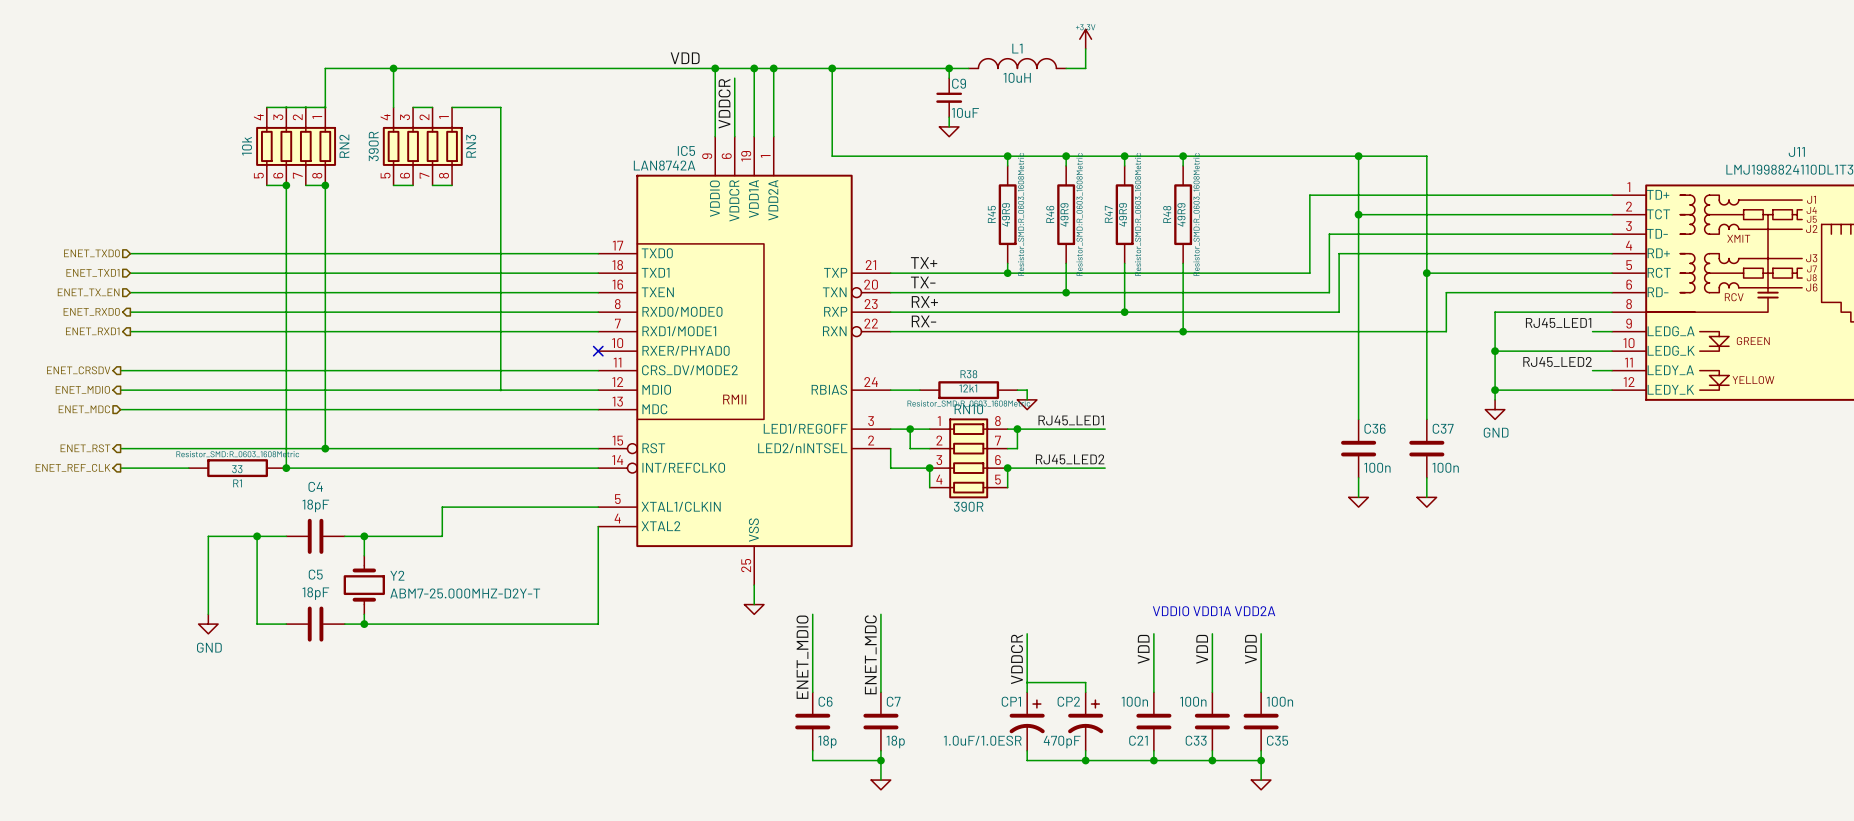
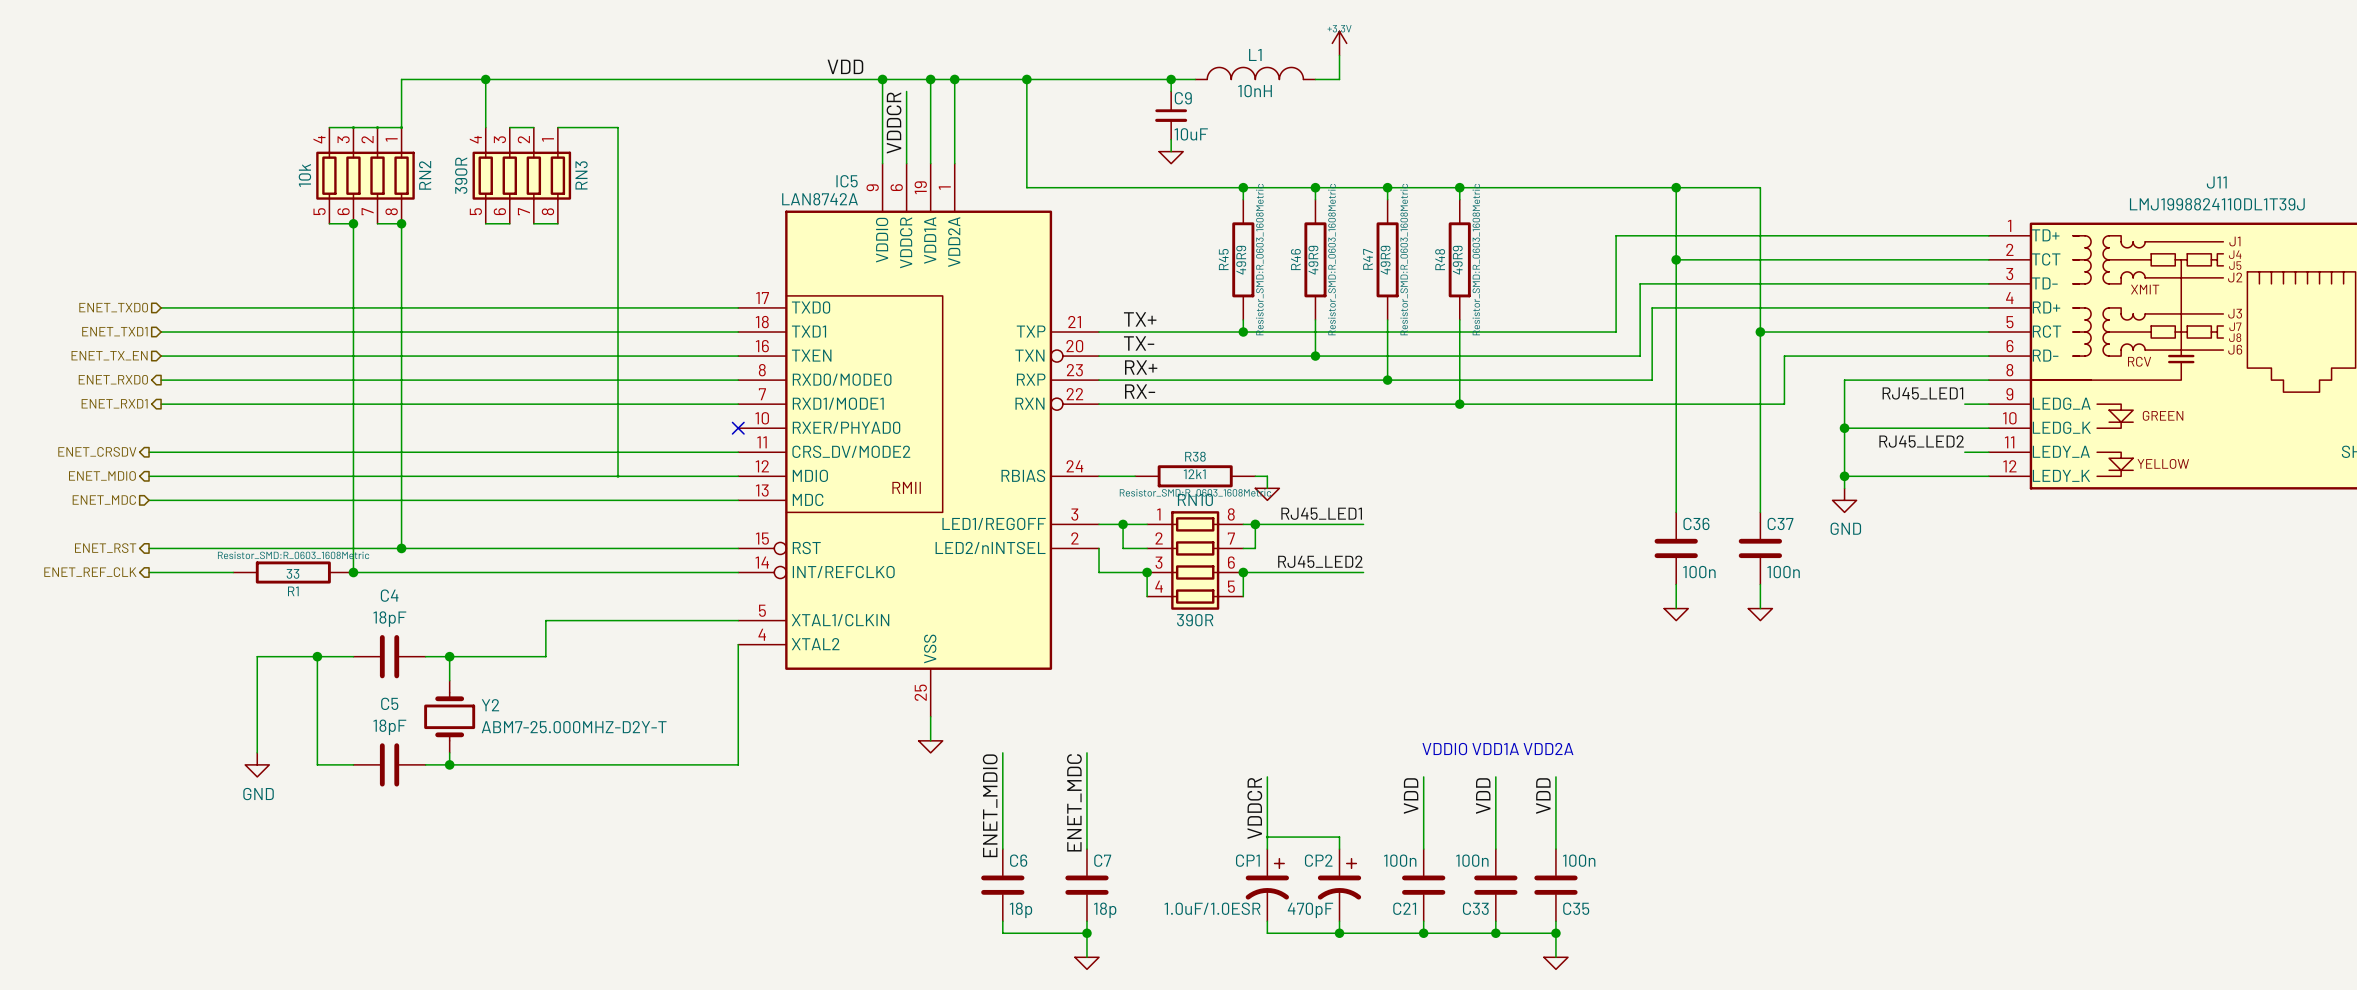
L1 value: 10uH (1017, 77) -> 10nH (1255, 91)

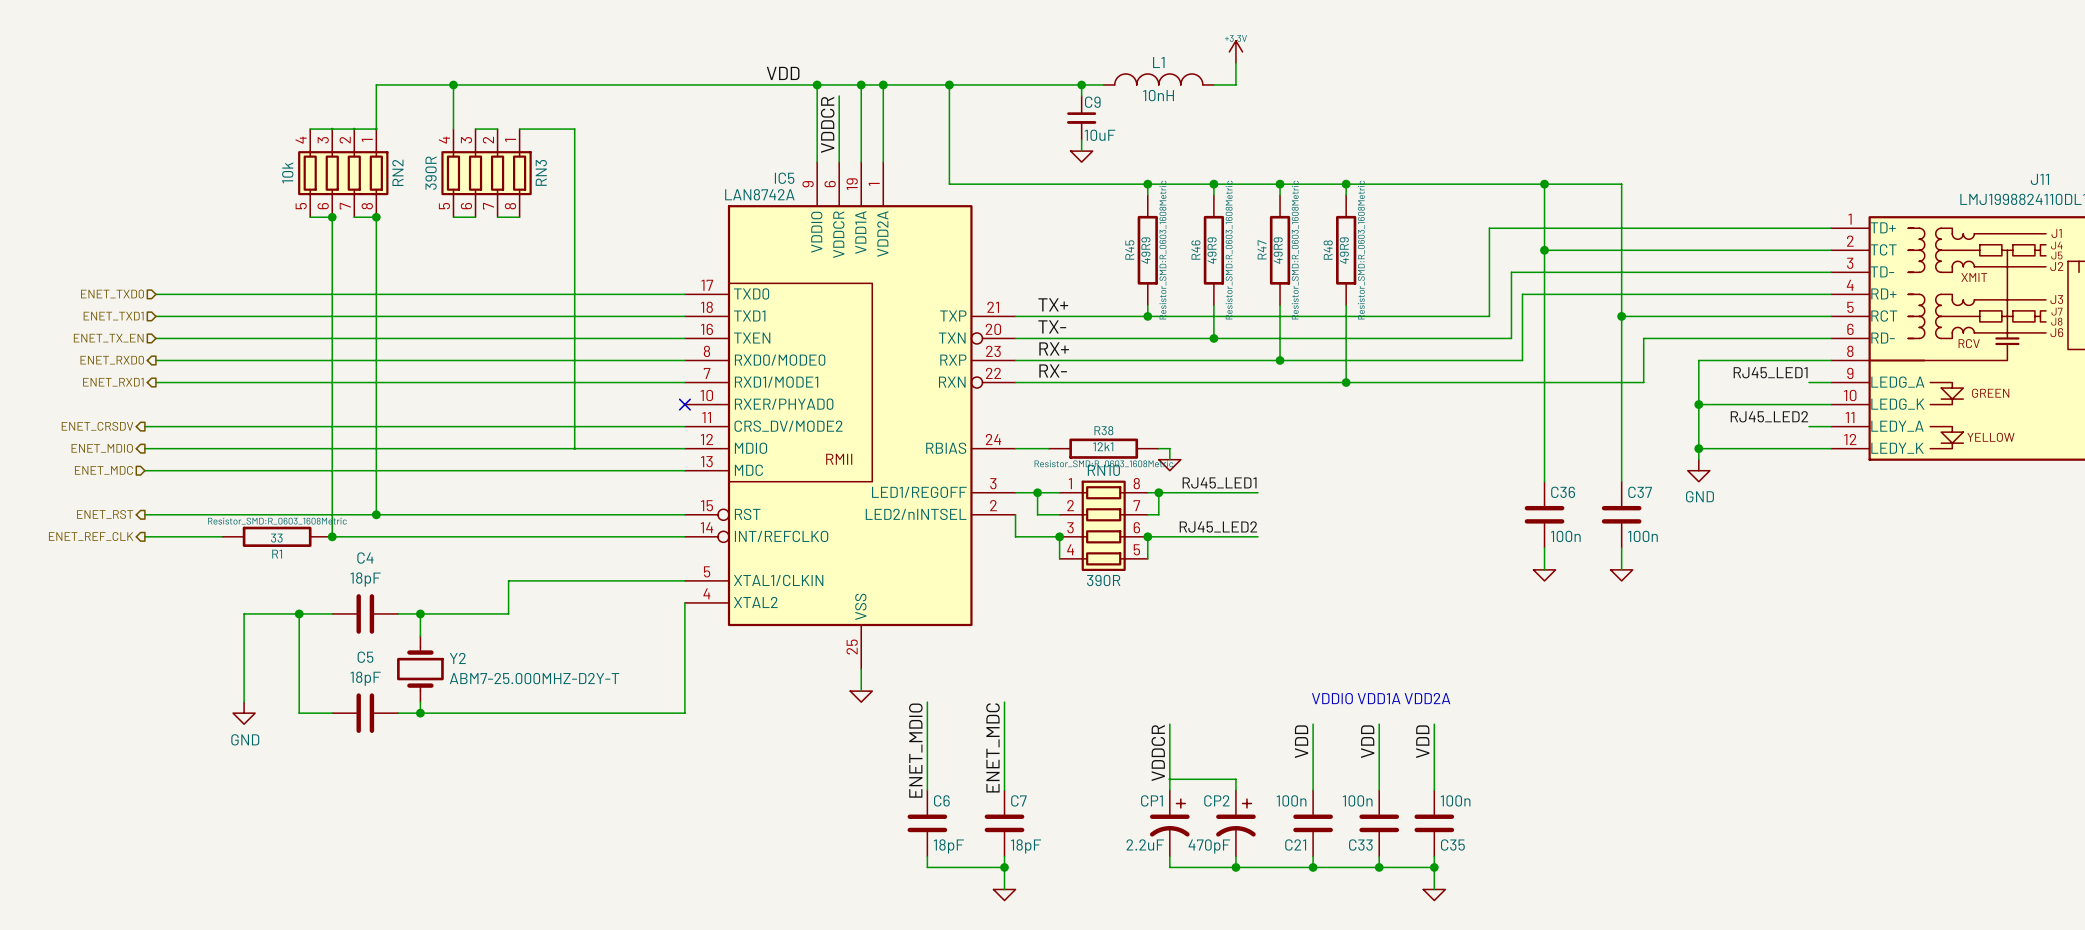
CP1 value: 1.0uF/1.0ESR (1212, 908) -> 2.2uF (1145, 844)
C6 value: 18p (1020, 910) -> 18pF (948, 846)
C7 value: 18p (1105, 910) -> 18pF (1025, 846)

